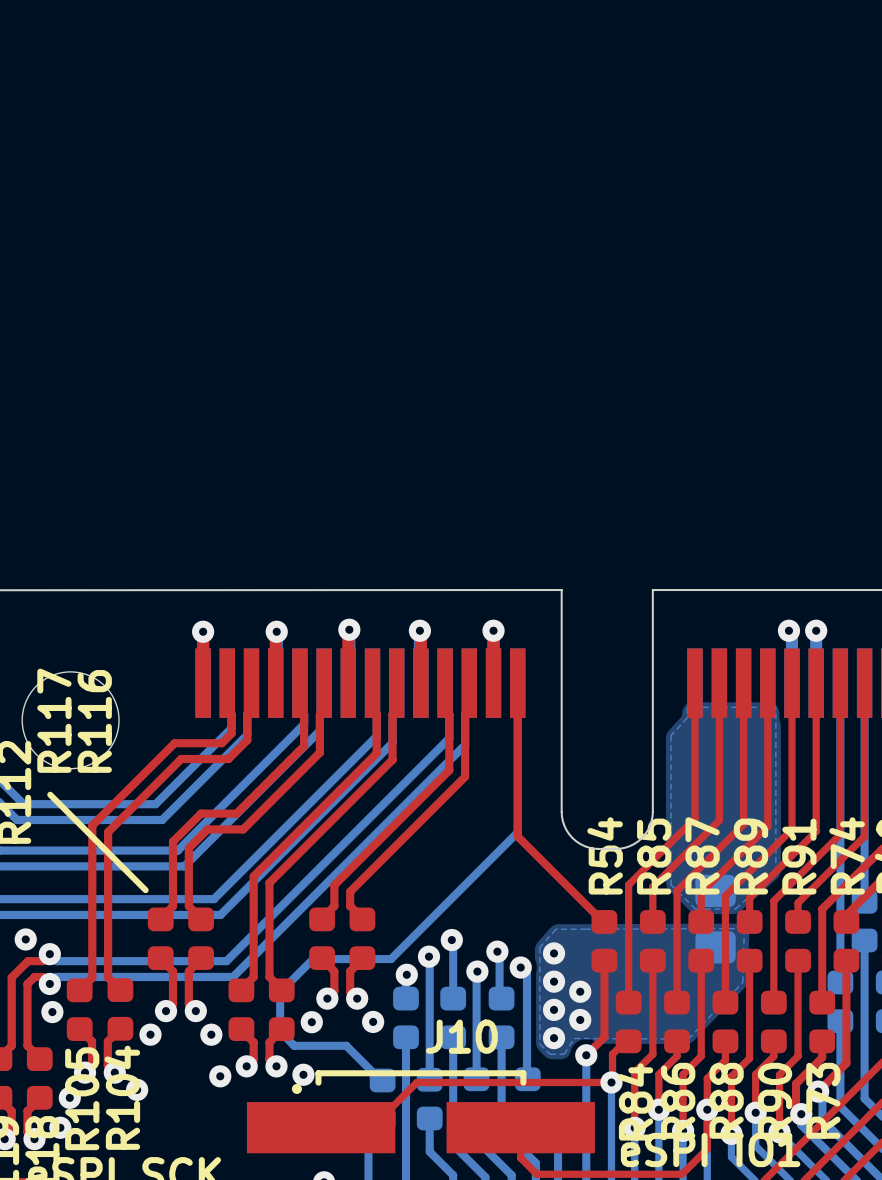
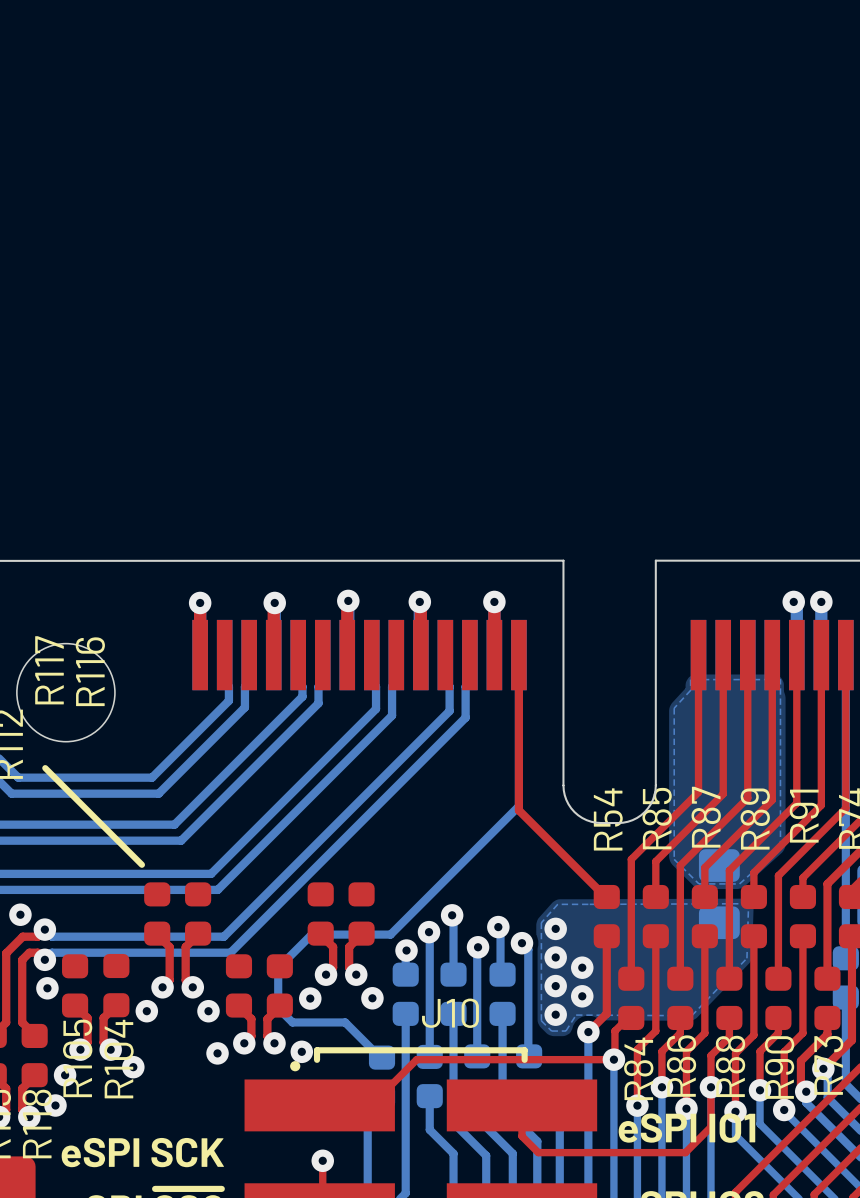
top track: (227, 683) (227, 710) (231, 714) (231, 733) (221, 743) (174, 743) (92, 825) (92, 977) (79, 990) -> none
top track: (251, 683) (251, 710) (247, 714) (247, 740) (228, 759) (181, 759) (108, 832) (108, 977) (120, 990) -> none
top track: (299, 683) (299, 710) (304, 714) (304, 746) (236, 813) (201, 813) (173, 841) (173, 906) (160, 919) -> none
top track: (324, 683) (324, 710) (319, 714) (319, 752) (243, 829) (207, 829) (188, 848) (188, 906) (201, 919) -> none
top track: (372, 683) (372, 710) (376, 714) (376, 753) (253, 876) (253, 977) (241, 990) -> none
top track: (396, 683) (396, 710) (392, 714) (392, 759) (269, 882) (269, 977) (281, 990) -> none
top track: (445, 683) (445, 710) (449, 714) (449, 770) (334, 885) (334, 906) (322, 919) -> none
top track: (469, 683) (469, 710) (465, 714) (465, 776) (350, 891) (350, 906) (362, 919) -> none

